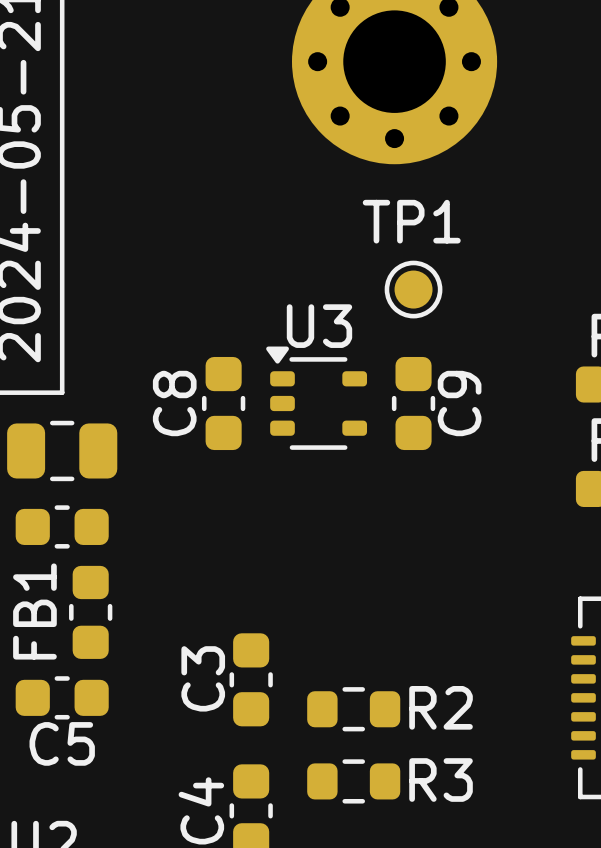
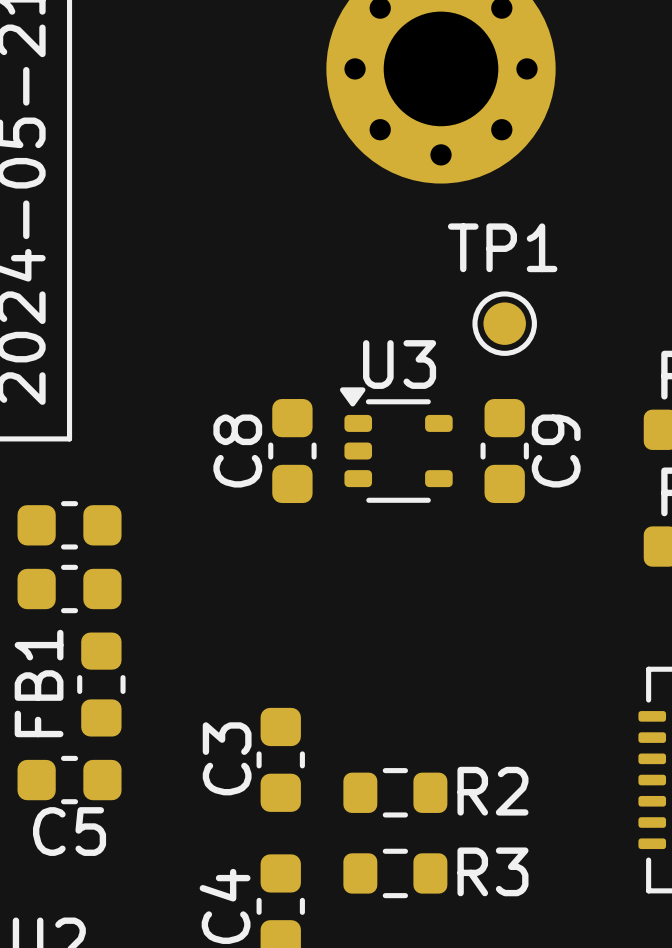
TP1 position: (413, 289) -> (504, 323)
U3 position: (316, 398) -> (396, 445)
C8 position: (223, 403) -> (292, 451)
C9 position: (413, 403) -> (504, 451)
part footprint: [7, 420, 118, 482] -> [17, 501, 122, 550]

